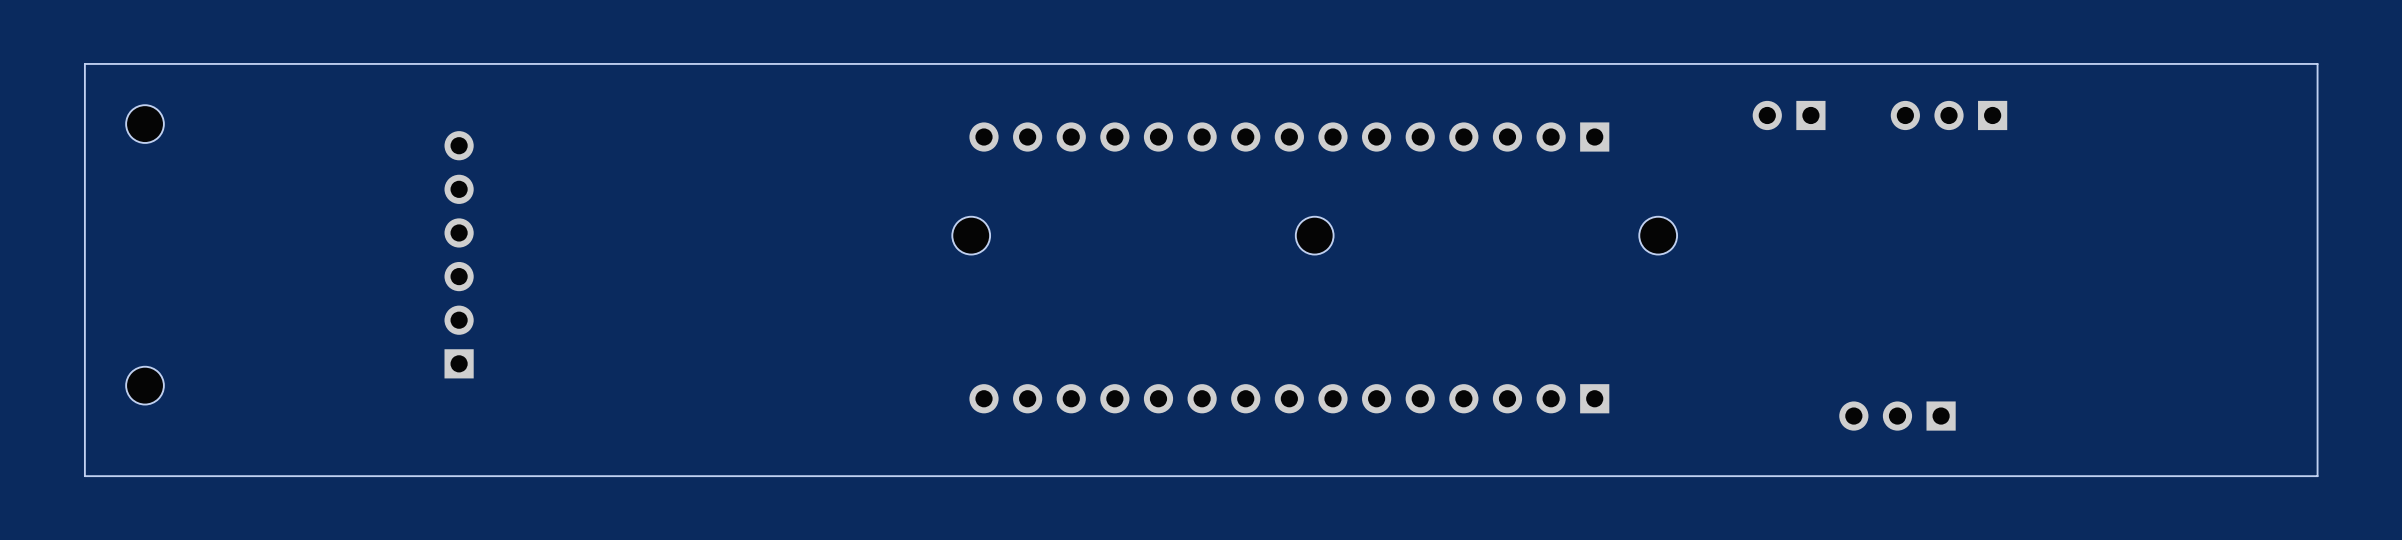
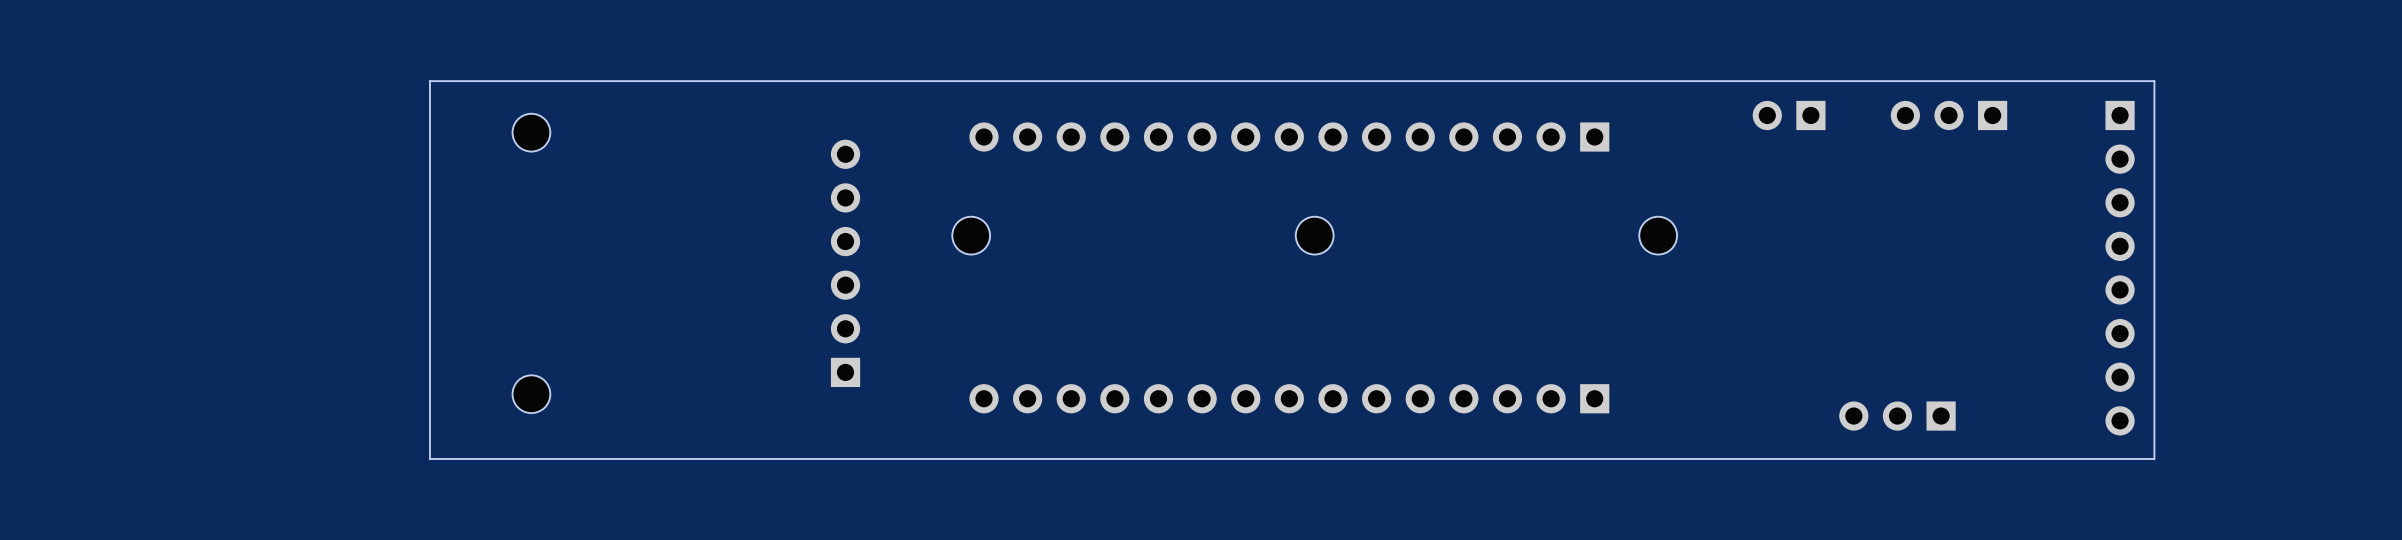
board edge: (2317, 63) (84, 63) (84, 476) (2317, 476) (2317, 63) -> (2154, 81) (2154, 458) (430, 458) (430, 81) (2154, 81)
part: (145, 124) -> none
part: none -> (531, 132)
part position: (459, 254) -> (845, 263)
part: none -> (2120, 268)
part: (145, 385) -> none
part: none -> (531, 394)

